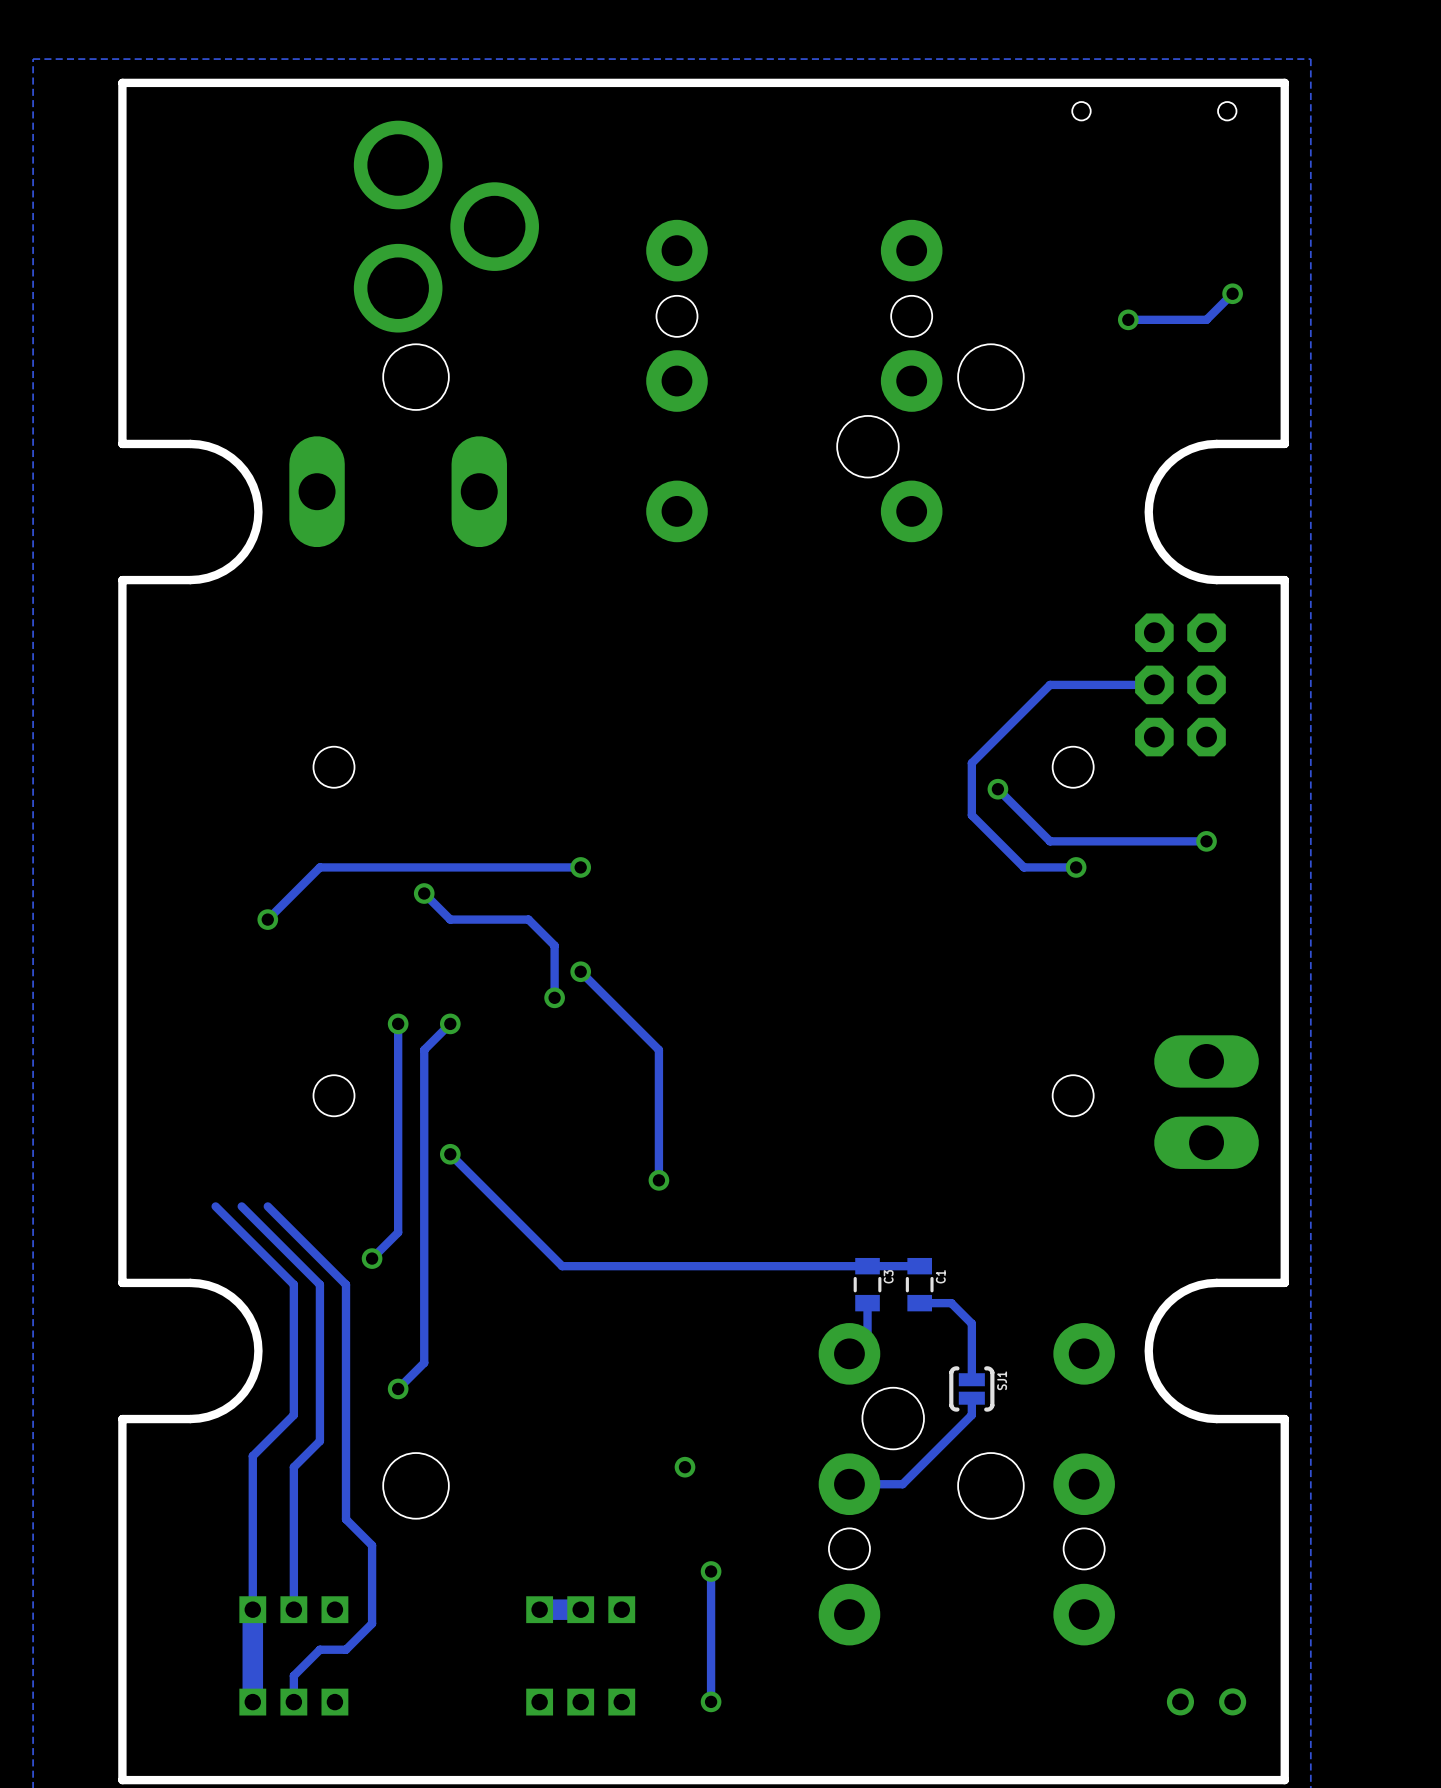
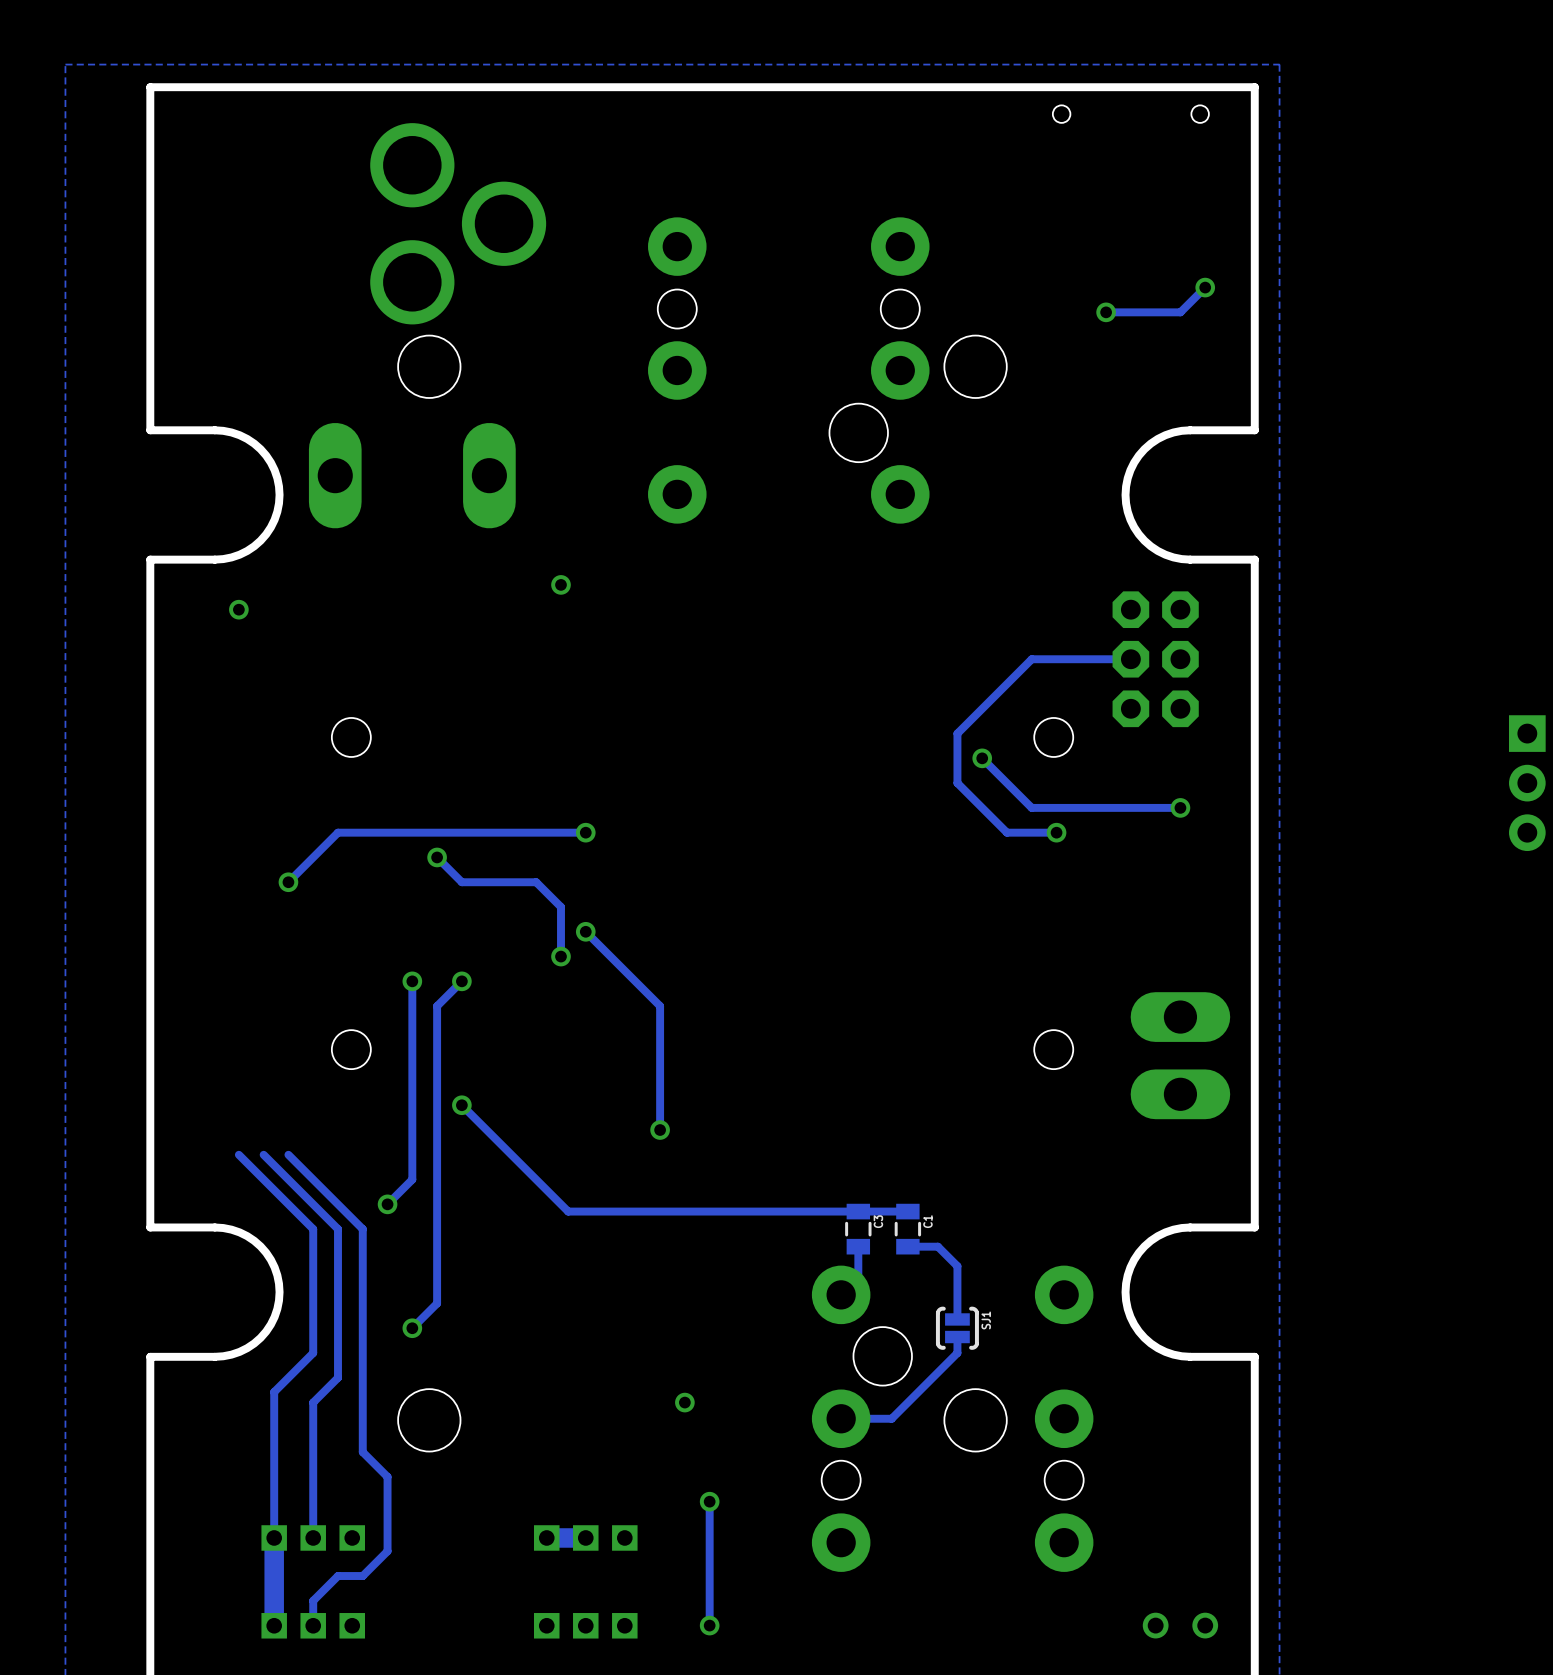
via: none -> (560, 584)
via: none -> (238, 609)

